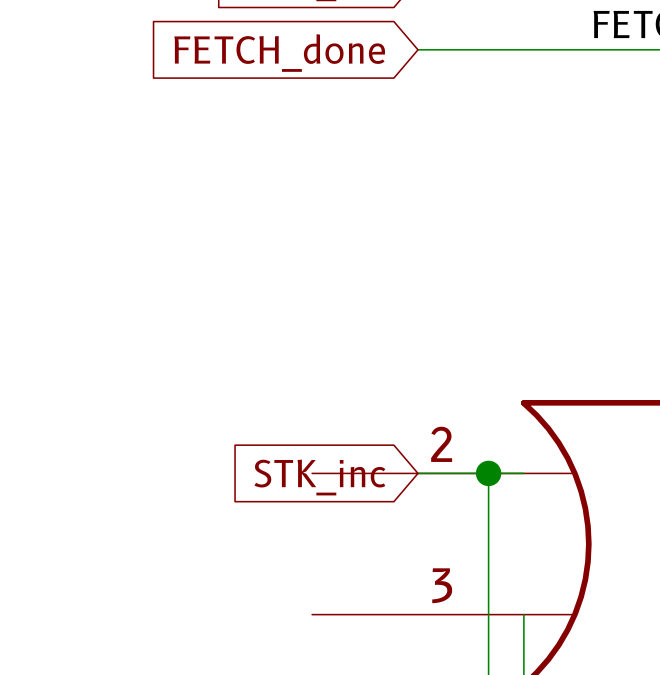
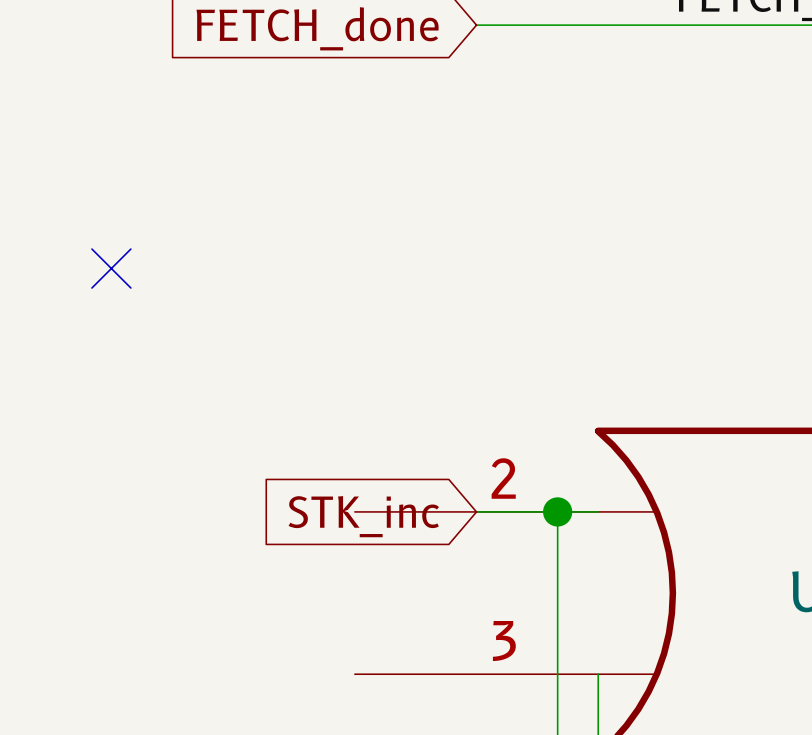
no-connect mark: none -> (111, 268)

